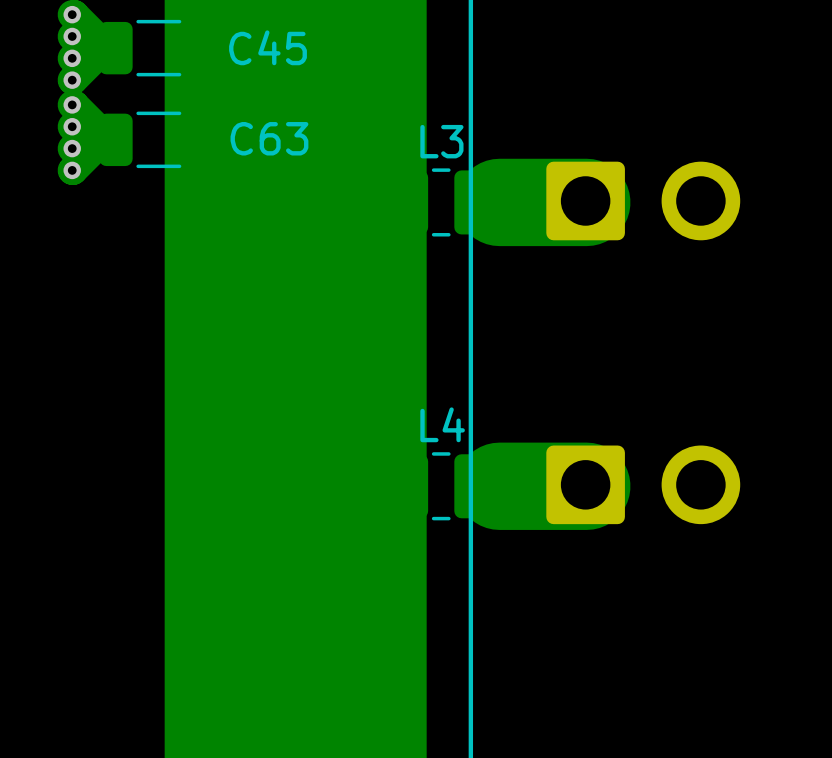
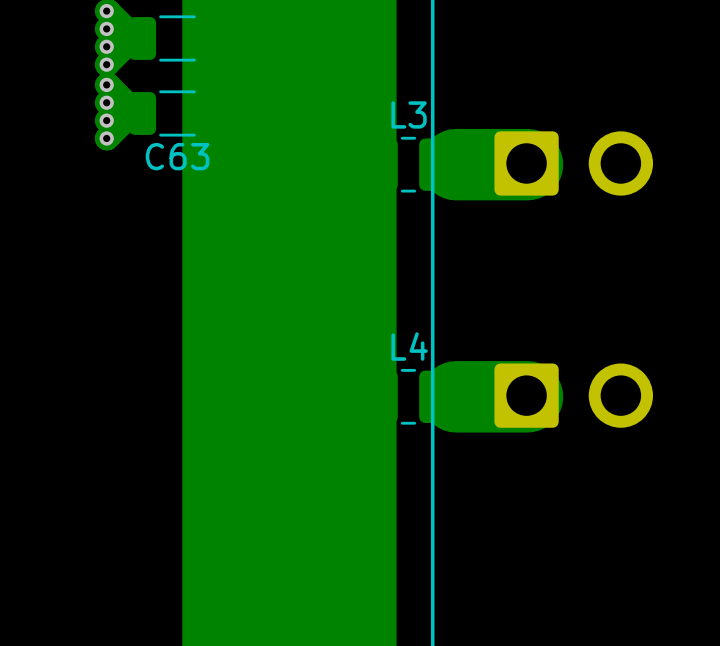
C45 name: C45 (268, 47) -> none
C63 name position: C63 (269, 138) -> C63 (177, 156)

